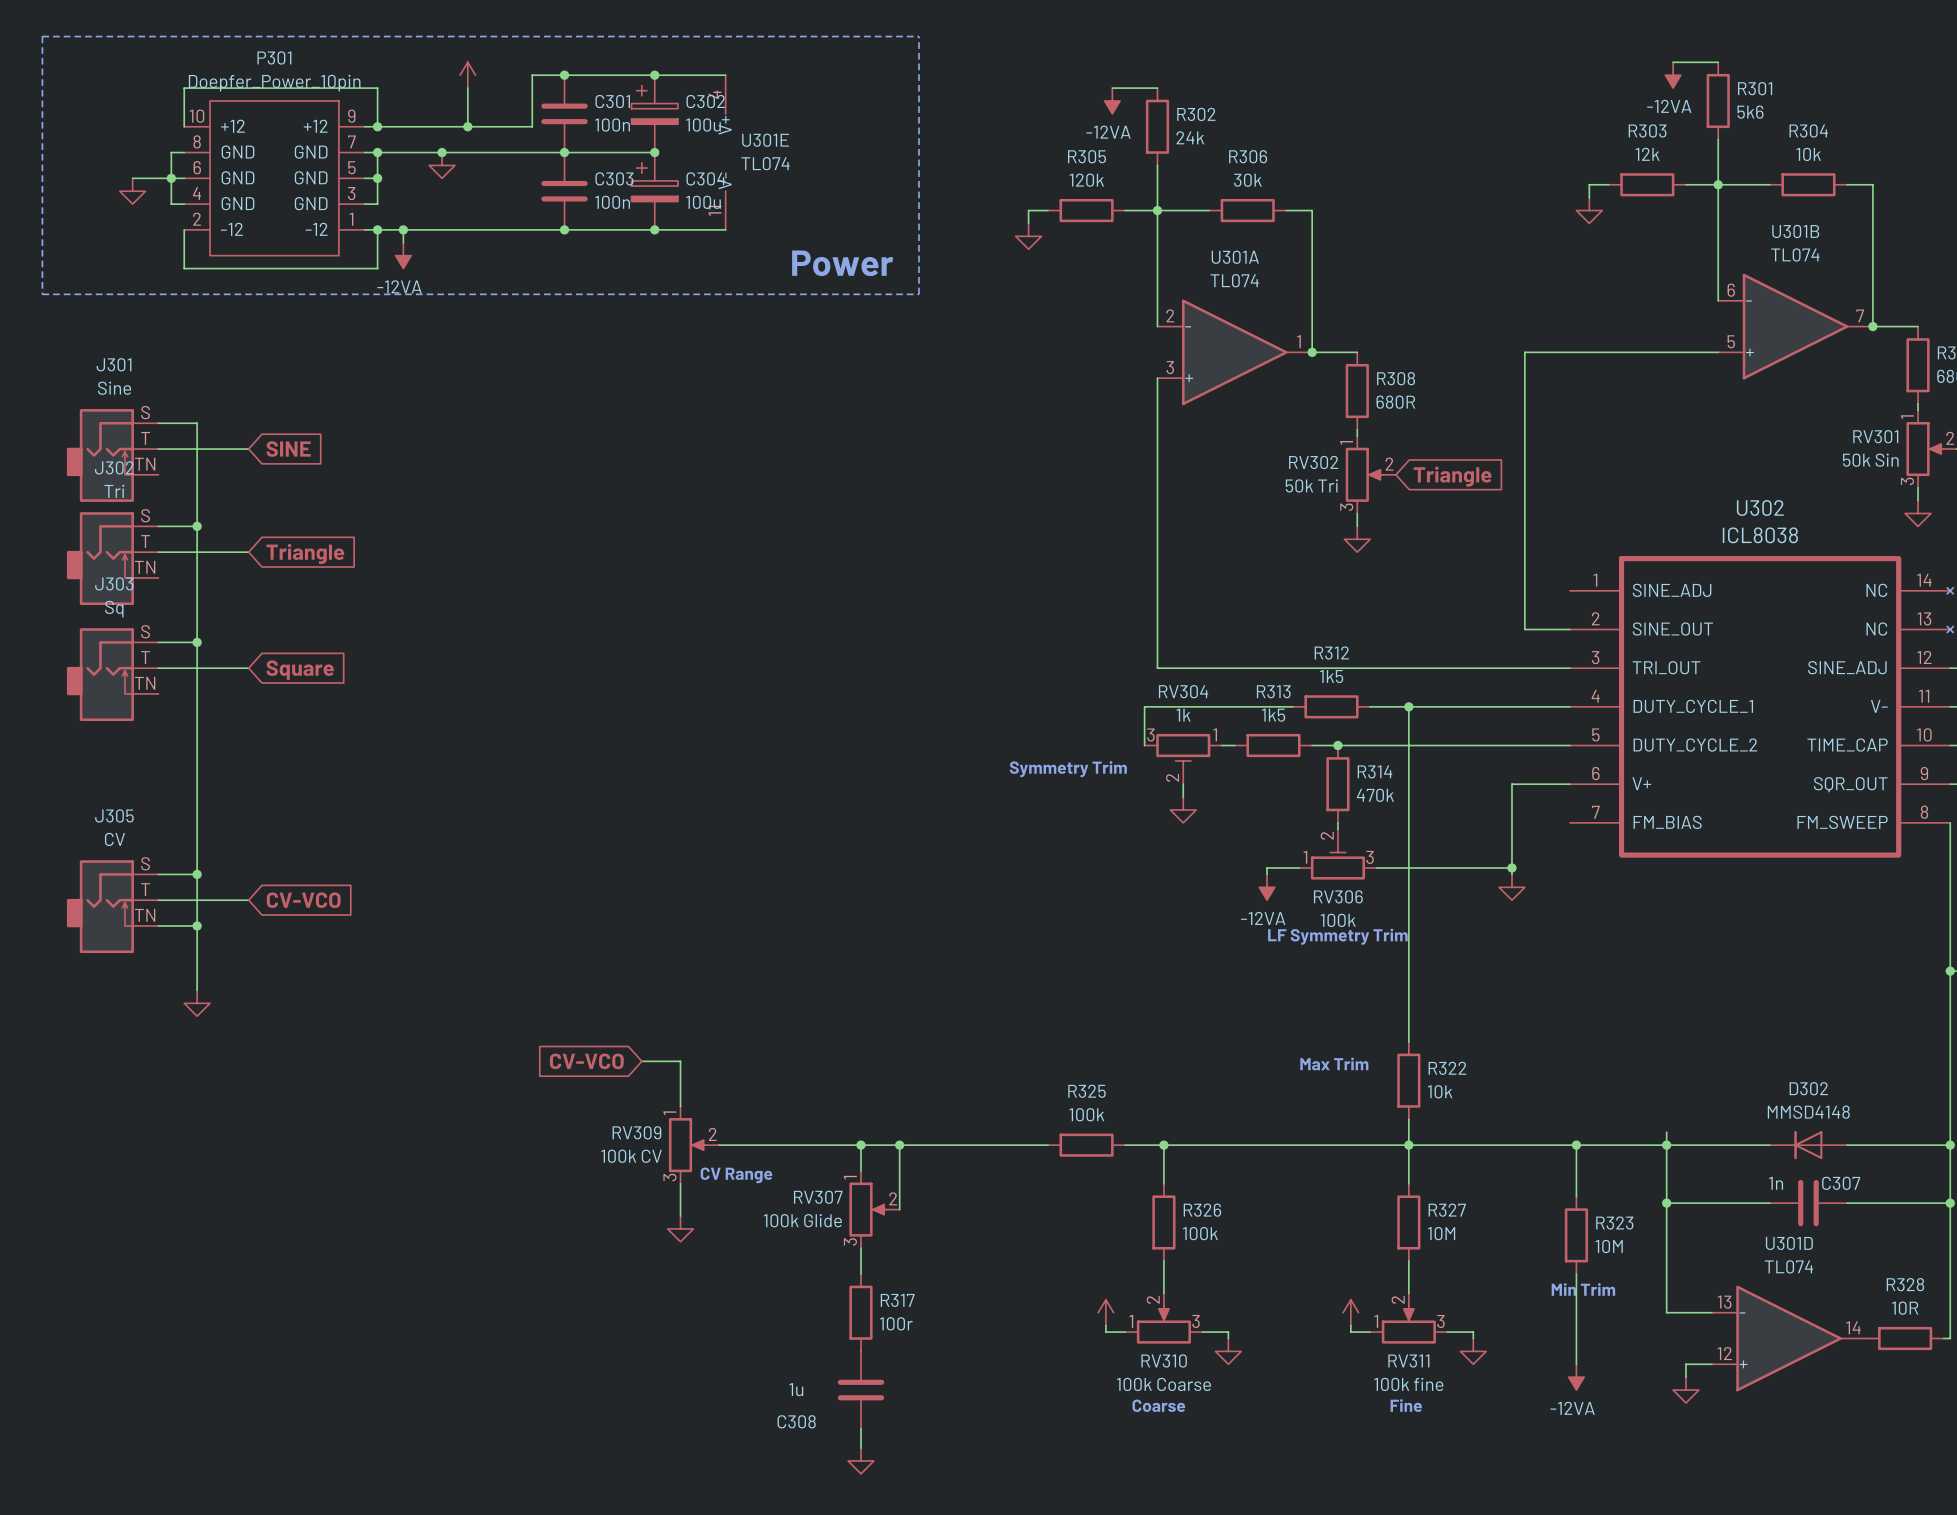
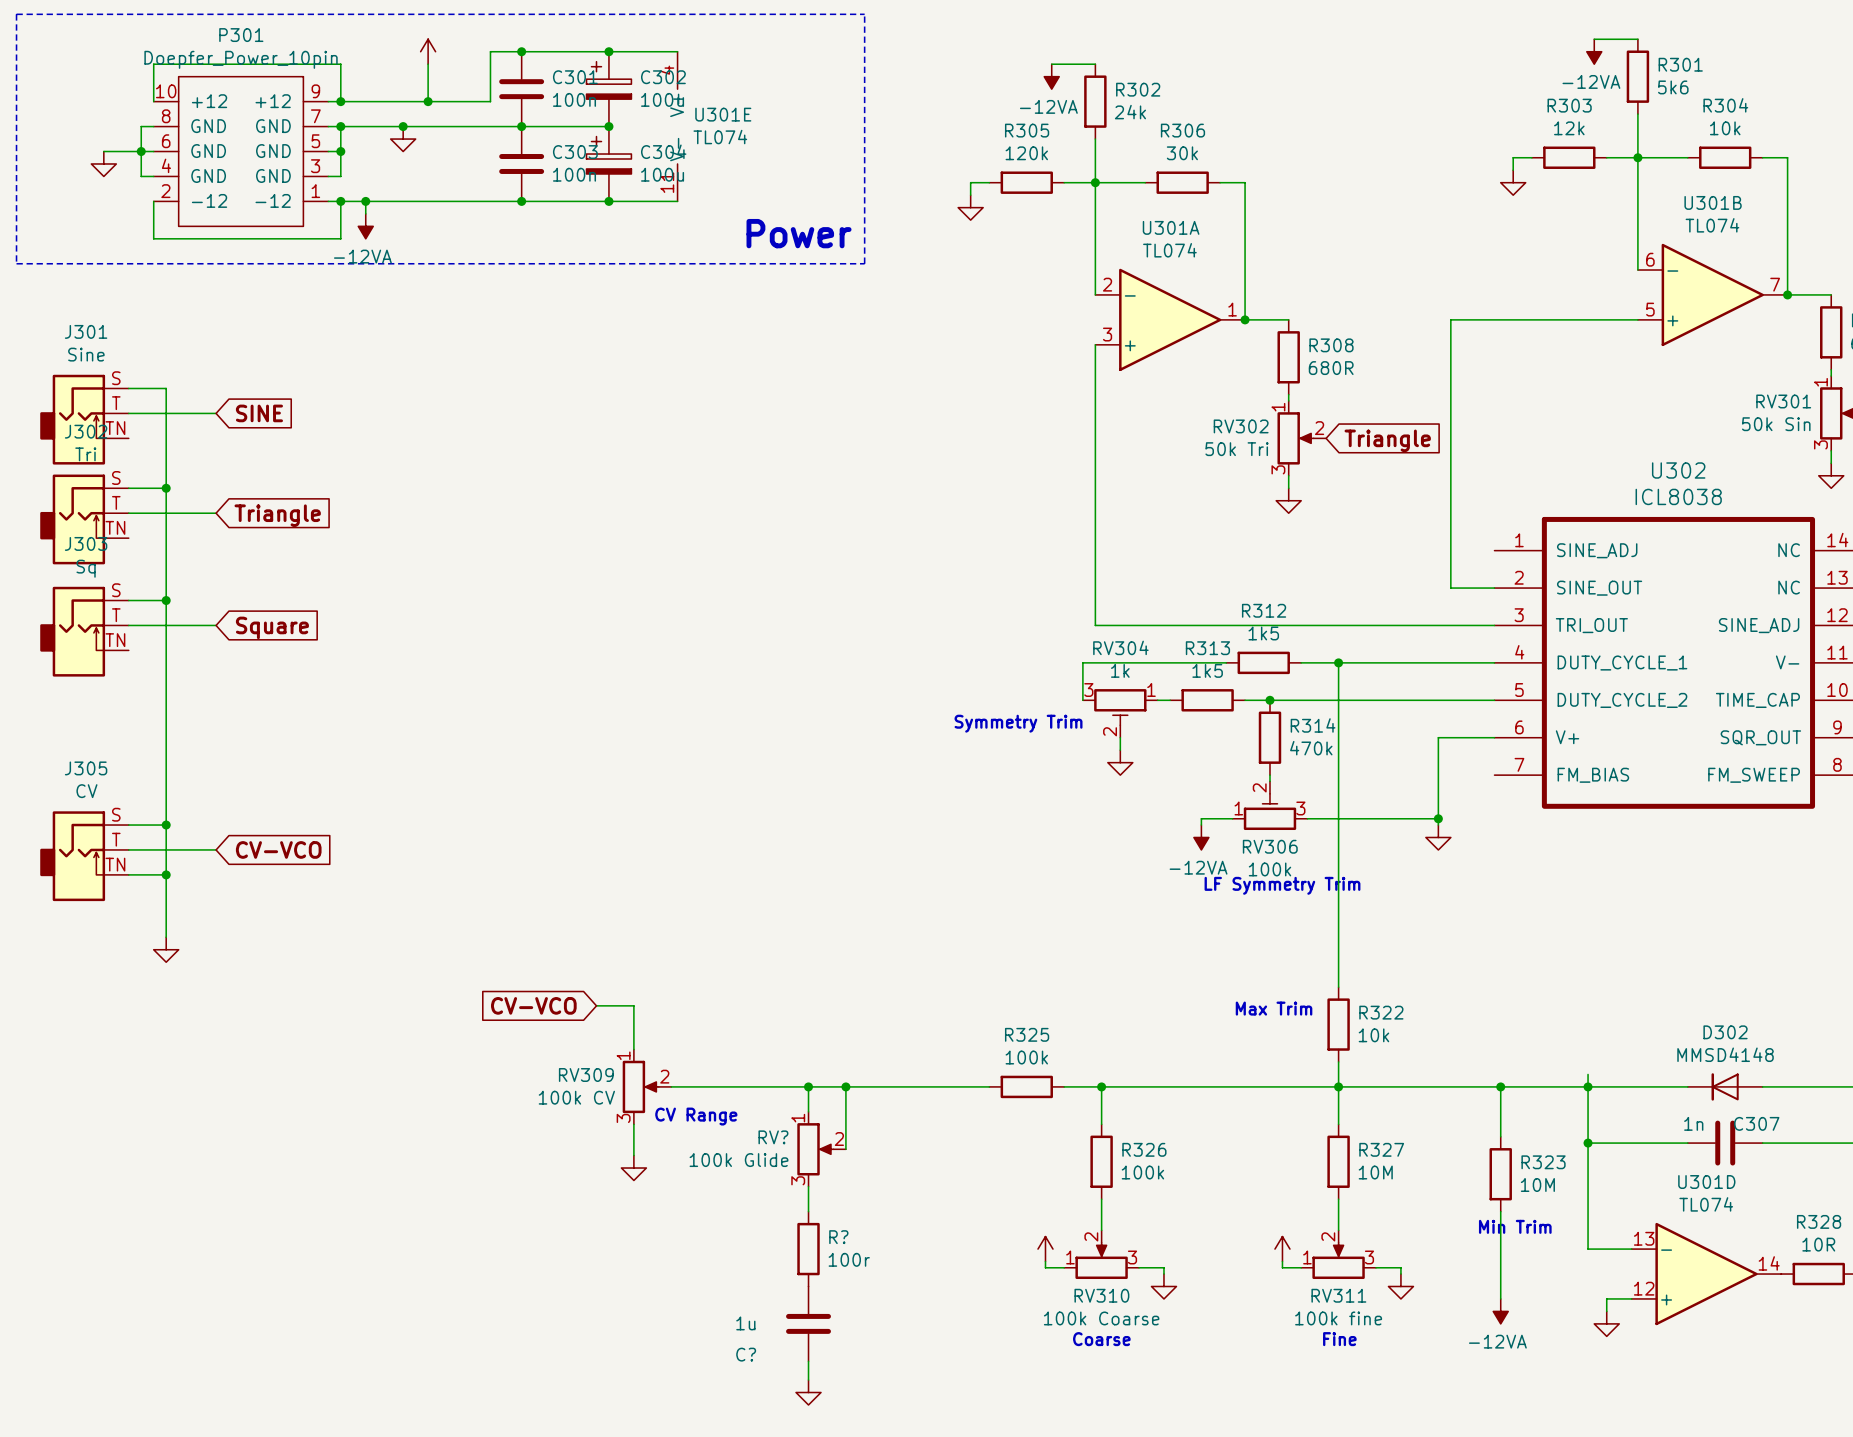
RV307 name: RV307 (818, 1197) -> RV? (773, 1137)
R317 name: R317 (897, 1300) -> R? (838, 1237)
C308 name: C308 (796, 1421) -> C? (746, 1354)

